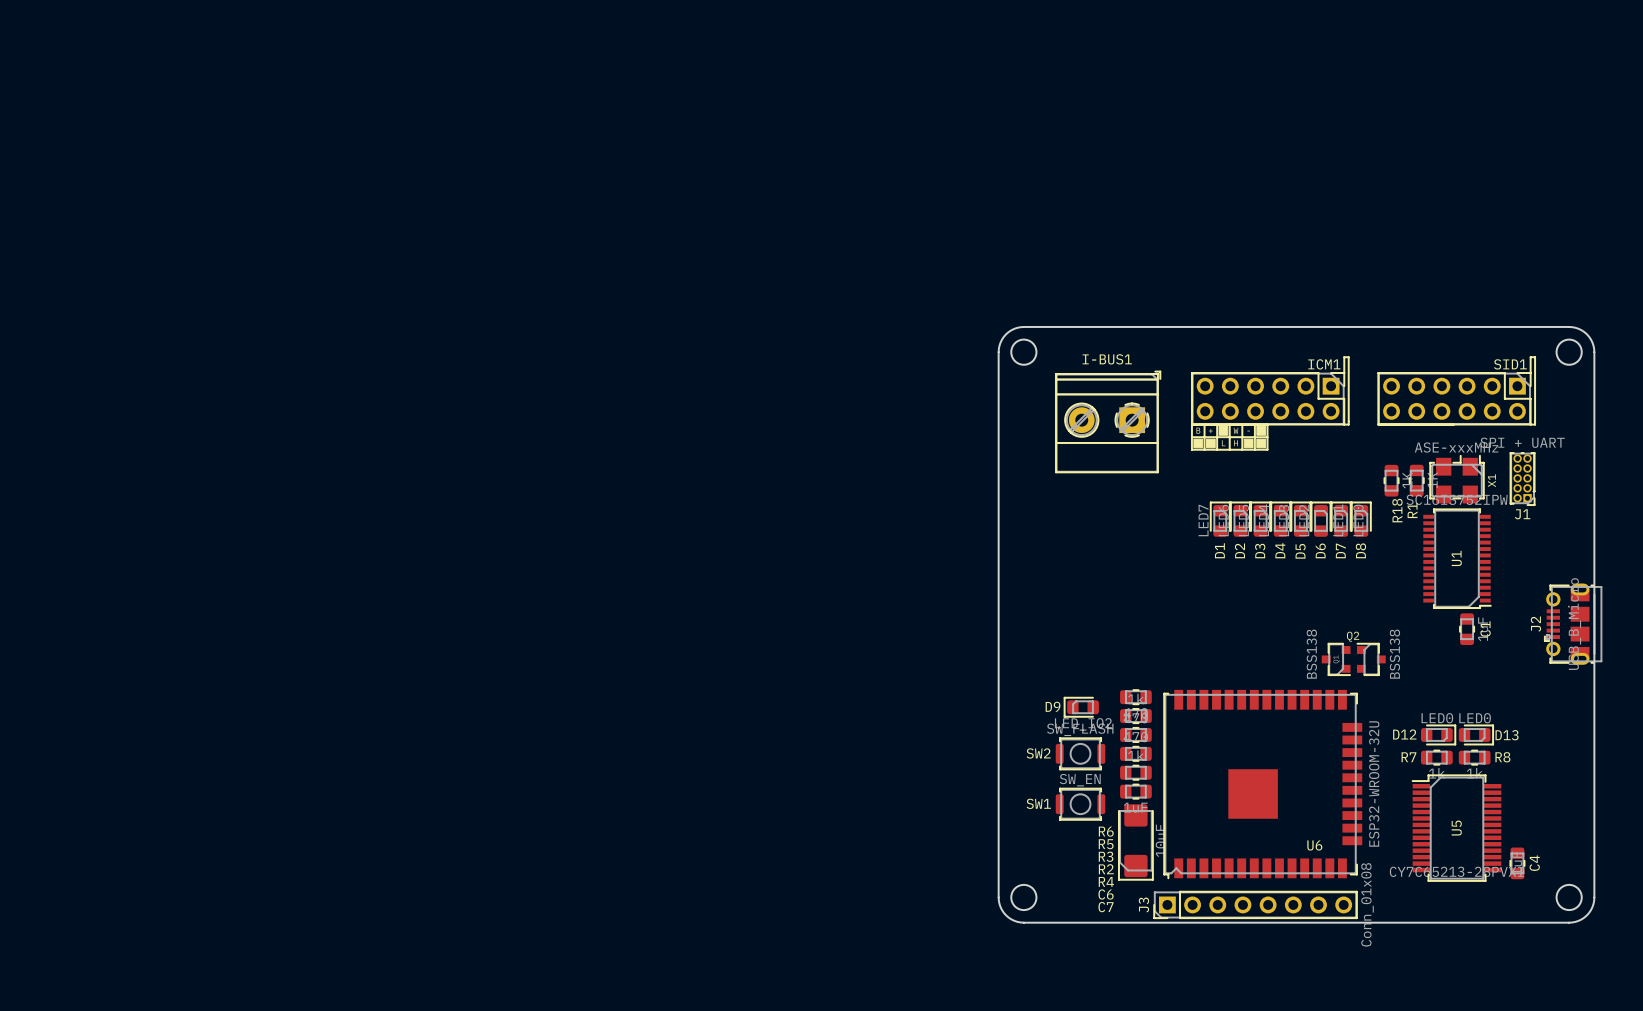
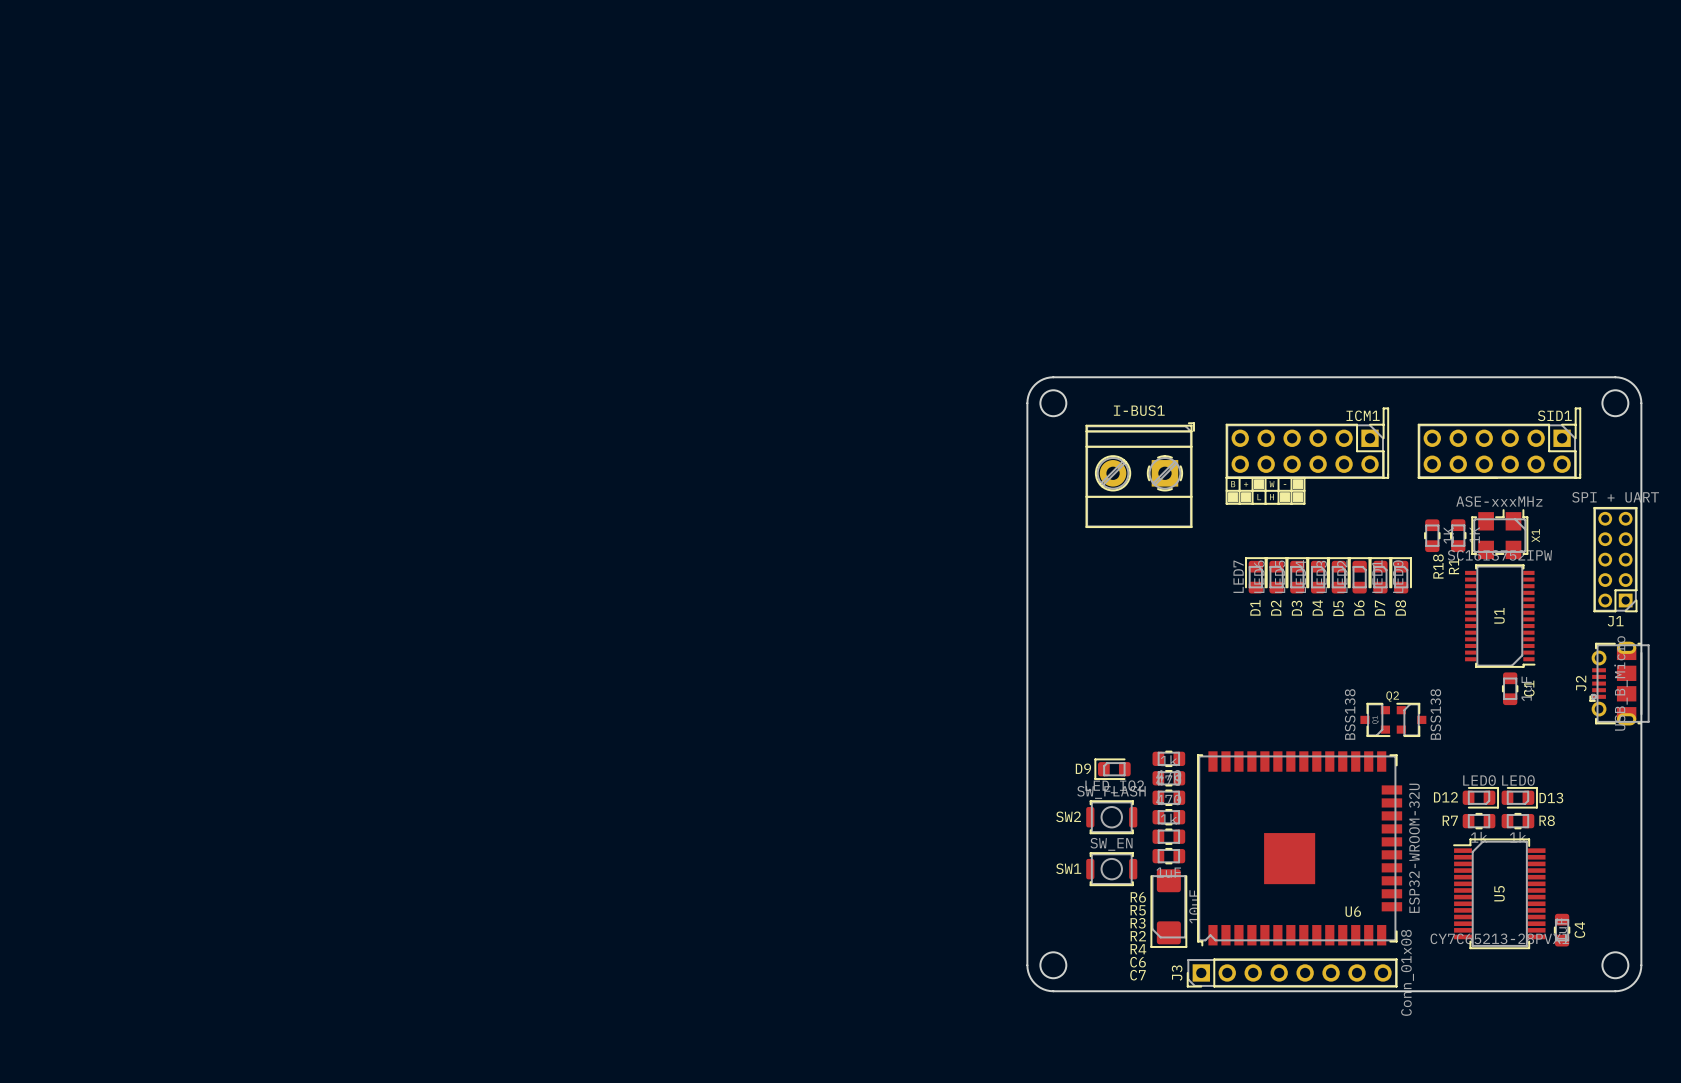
J1 value position: SPI + UART (1522, 442) -> SPI + UART (1615, 497)
J1 footprint: [1509, 452, 1536, 506] -> [1593, 507, 1638, 612]
J1 name position: J1 (1522, 514) -> J1 (1615, 621)

